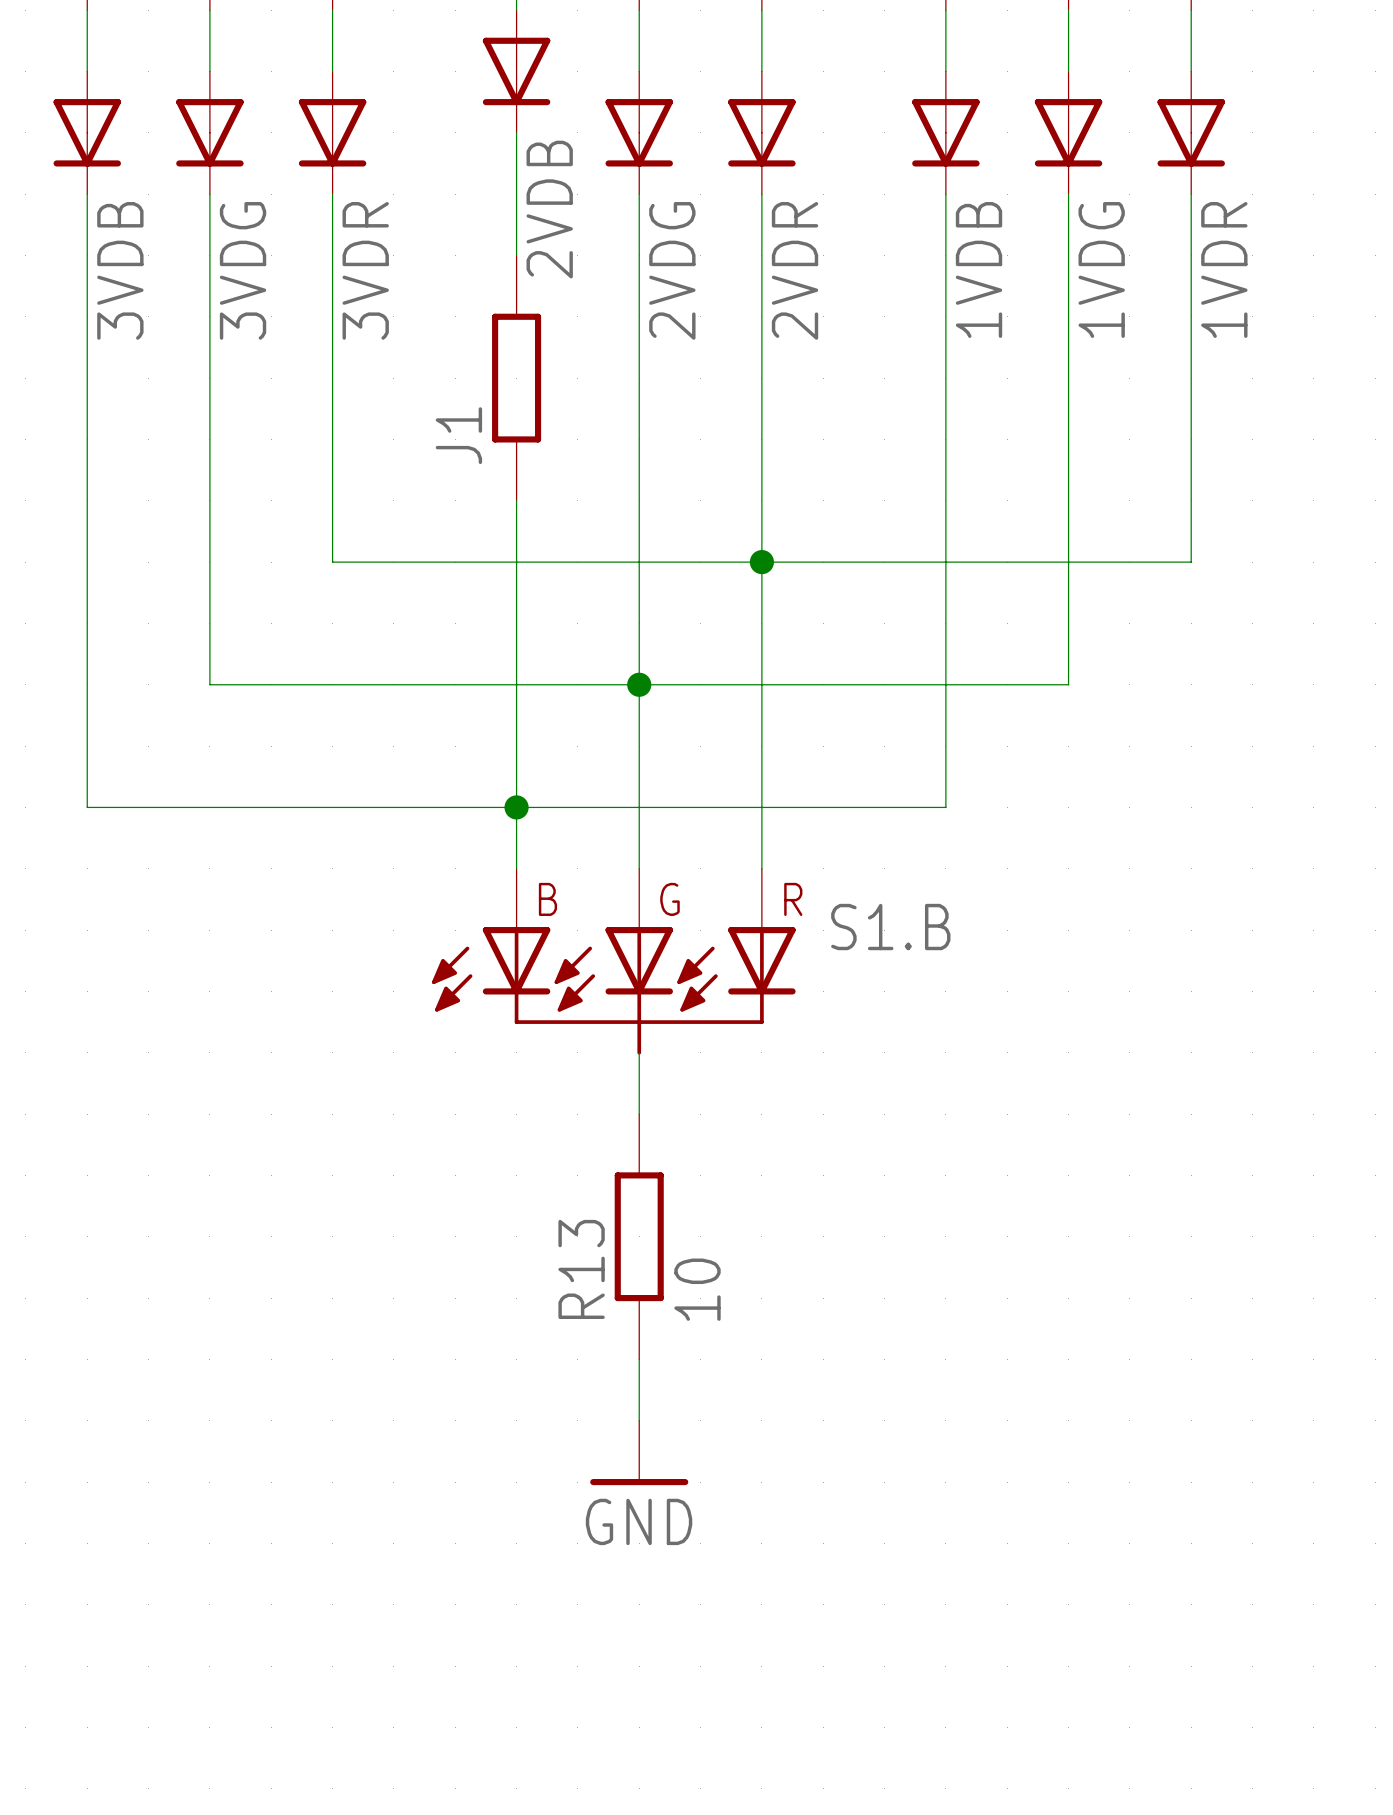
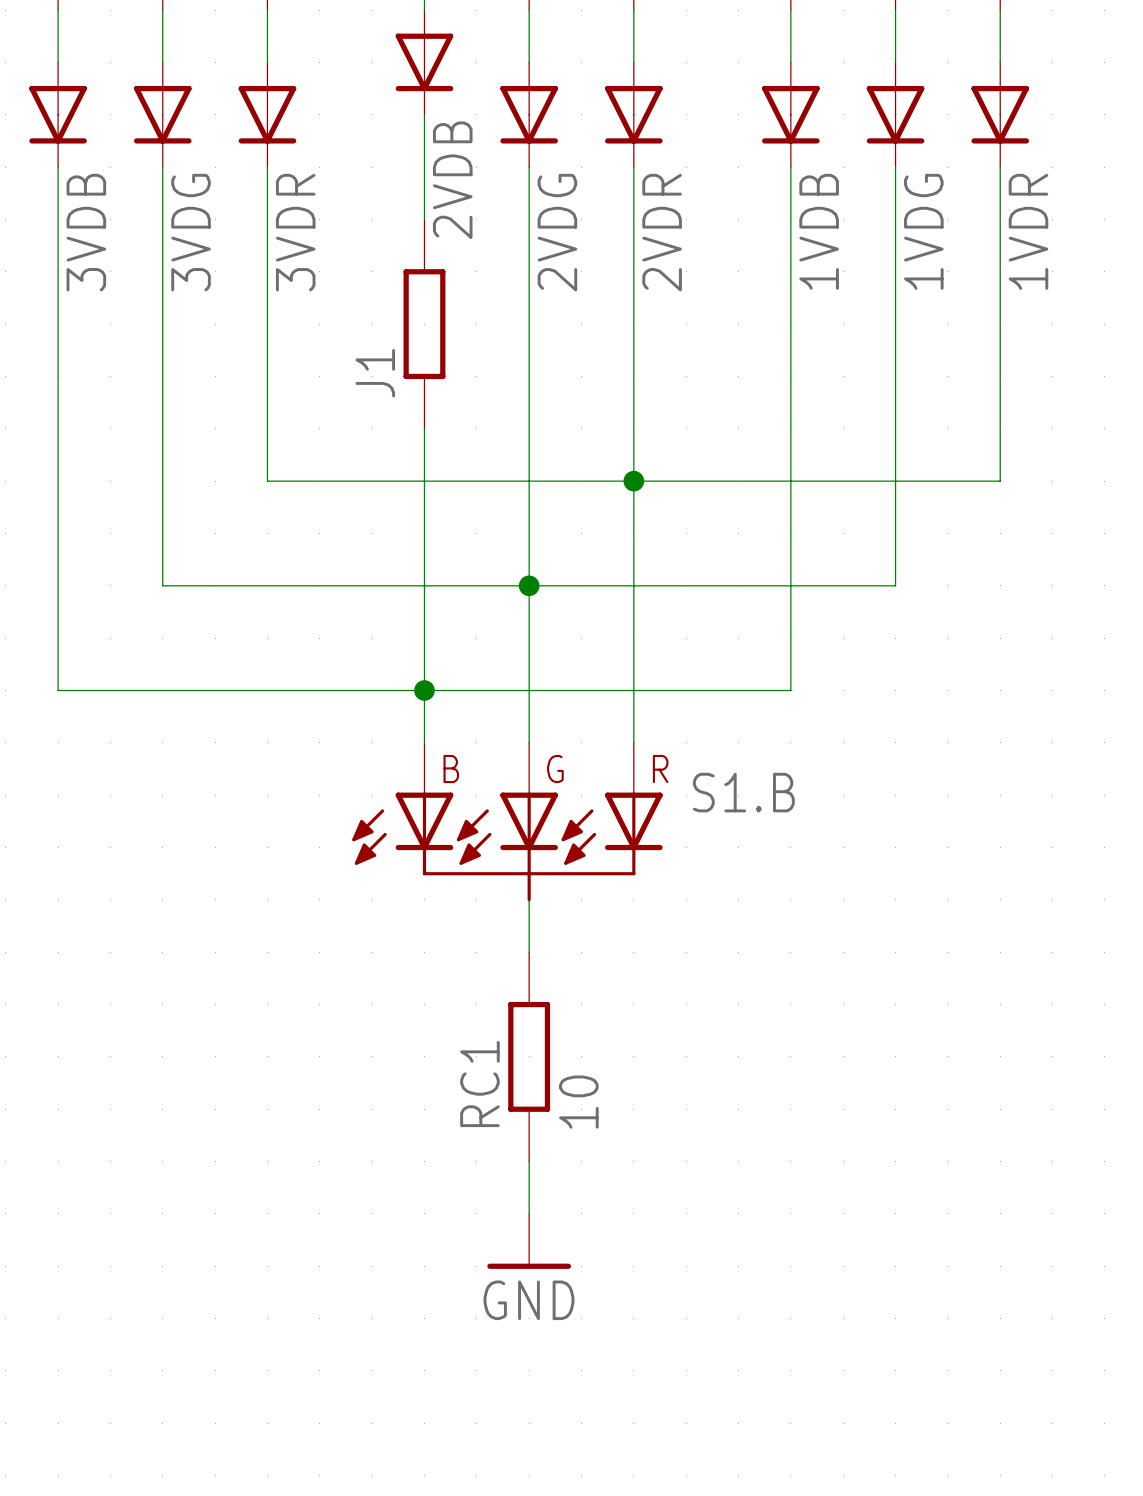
R13 name: R13 (581, 1269) -> RC1 (479, 1084)

